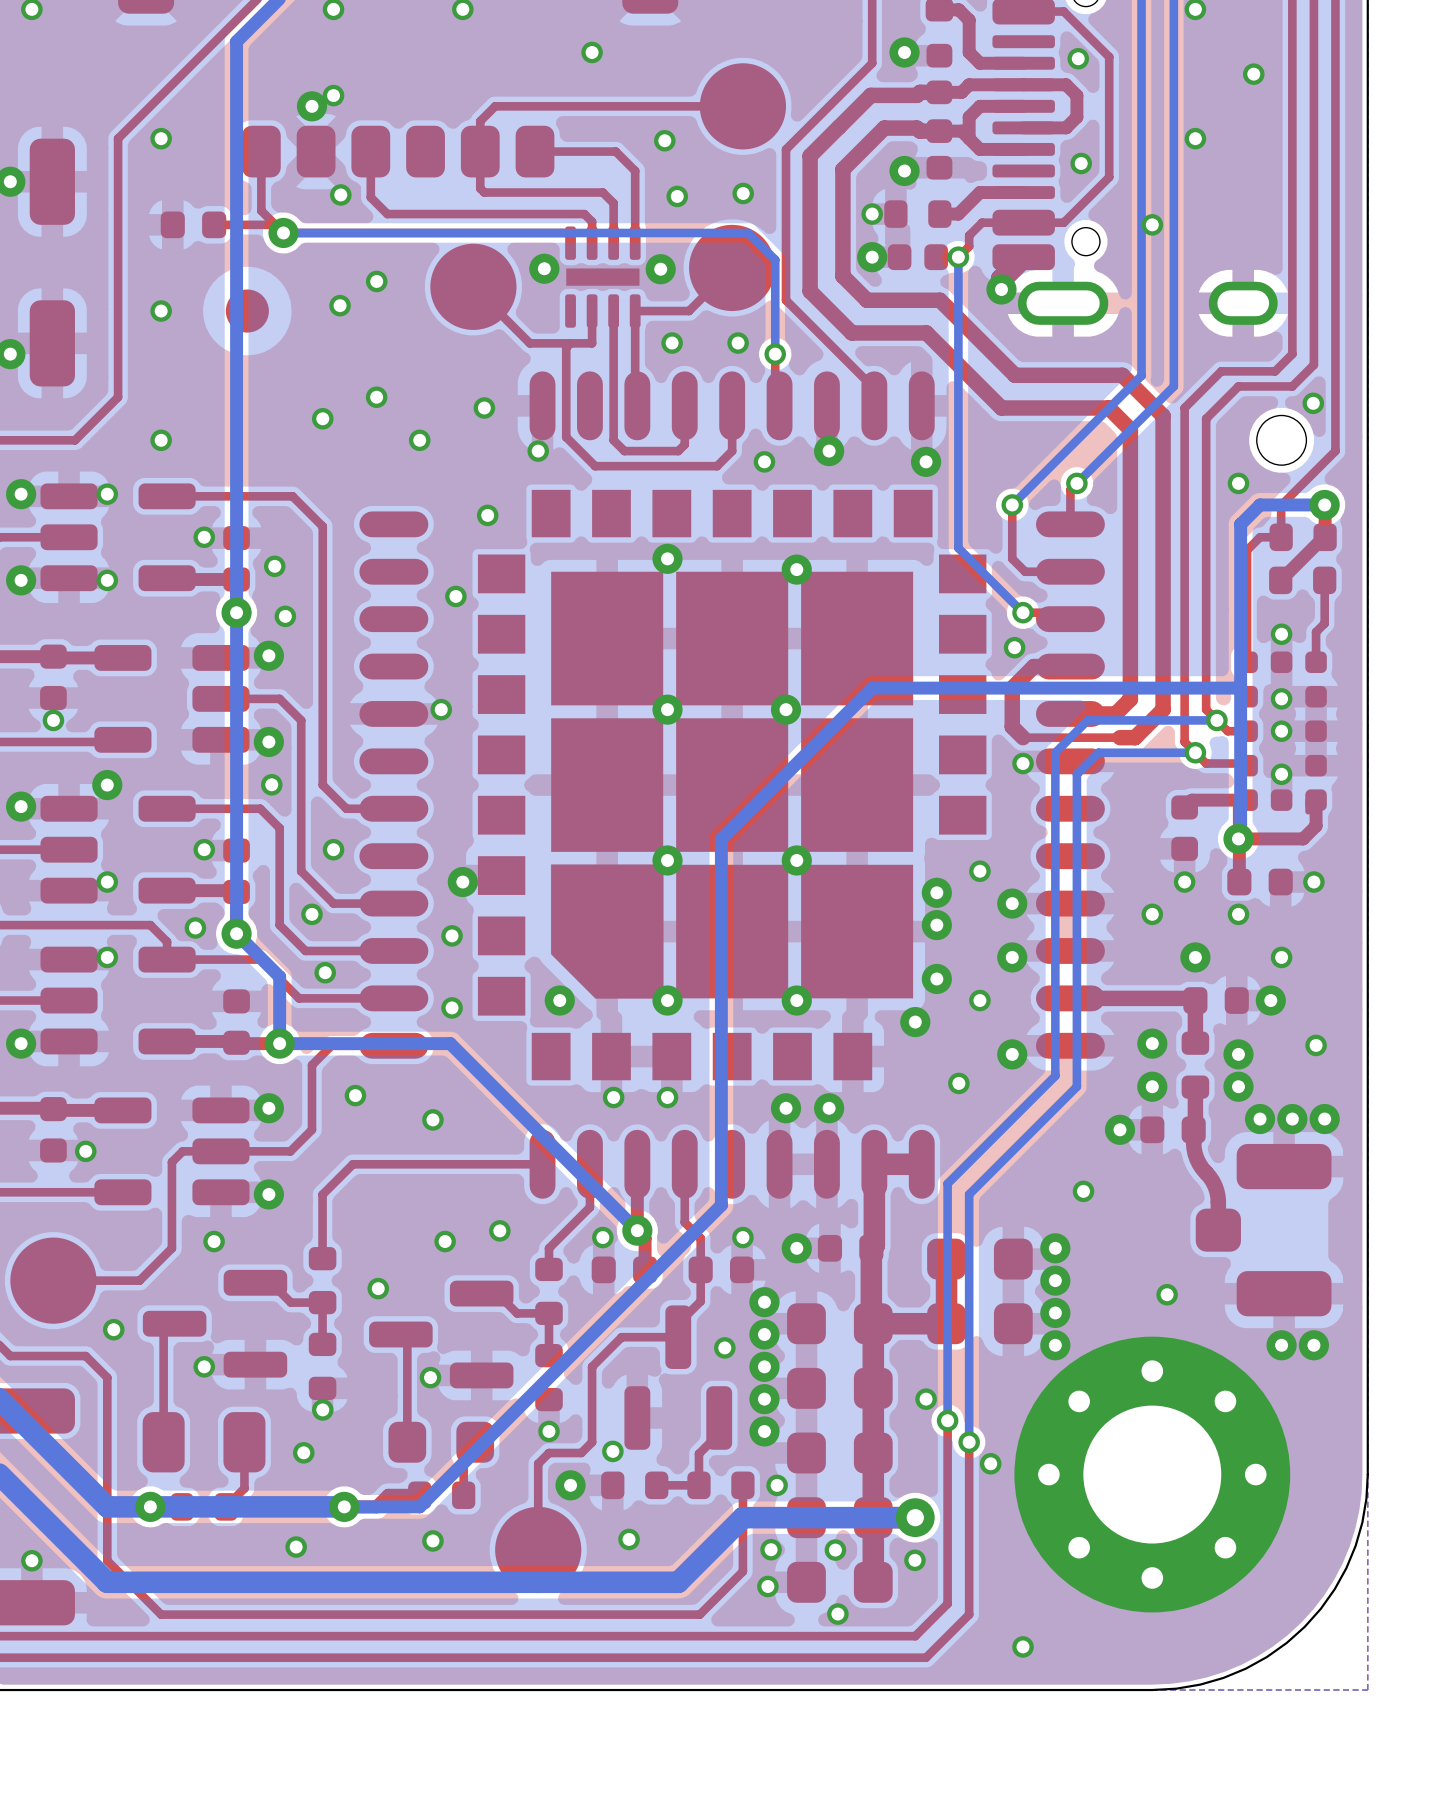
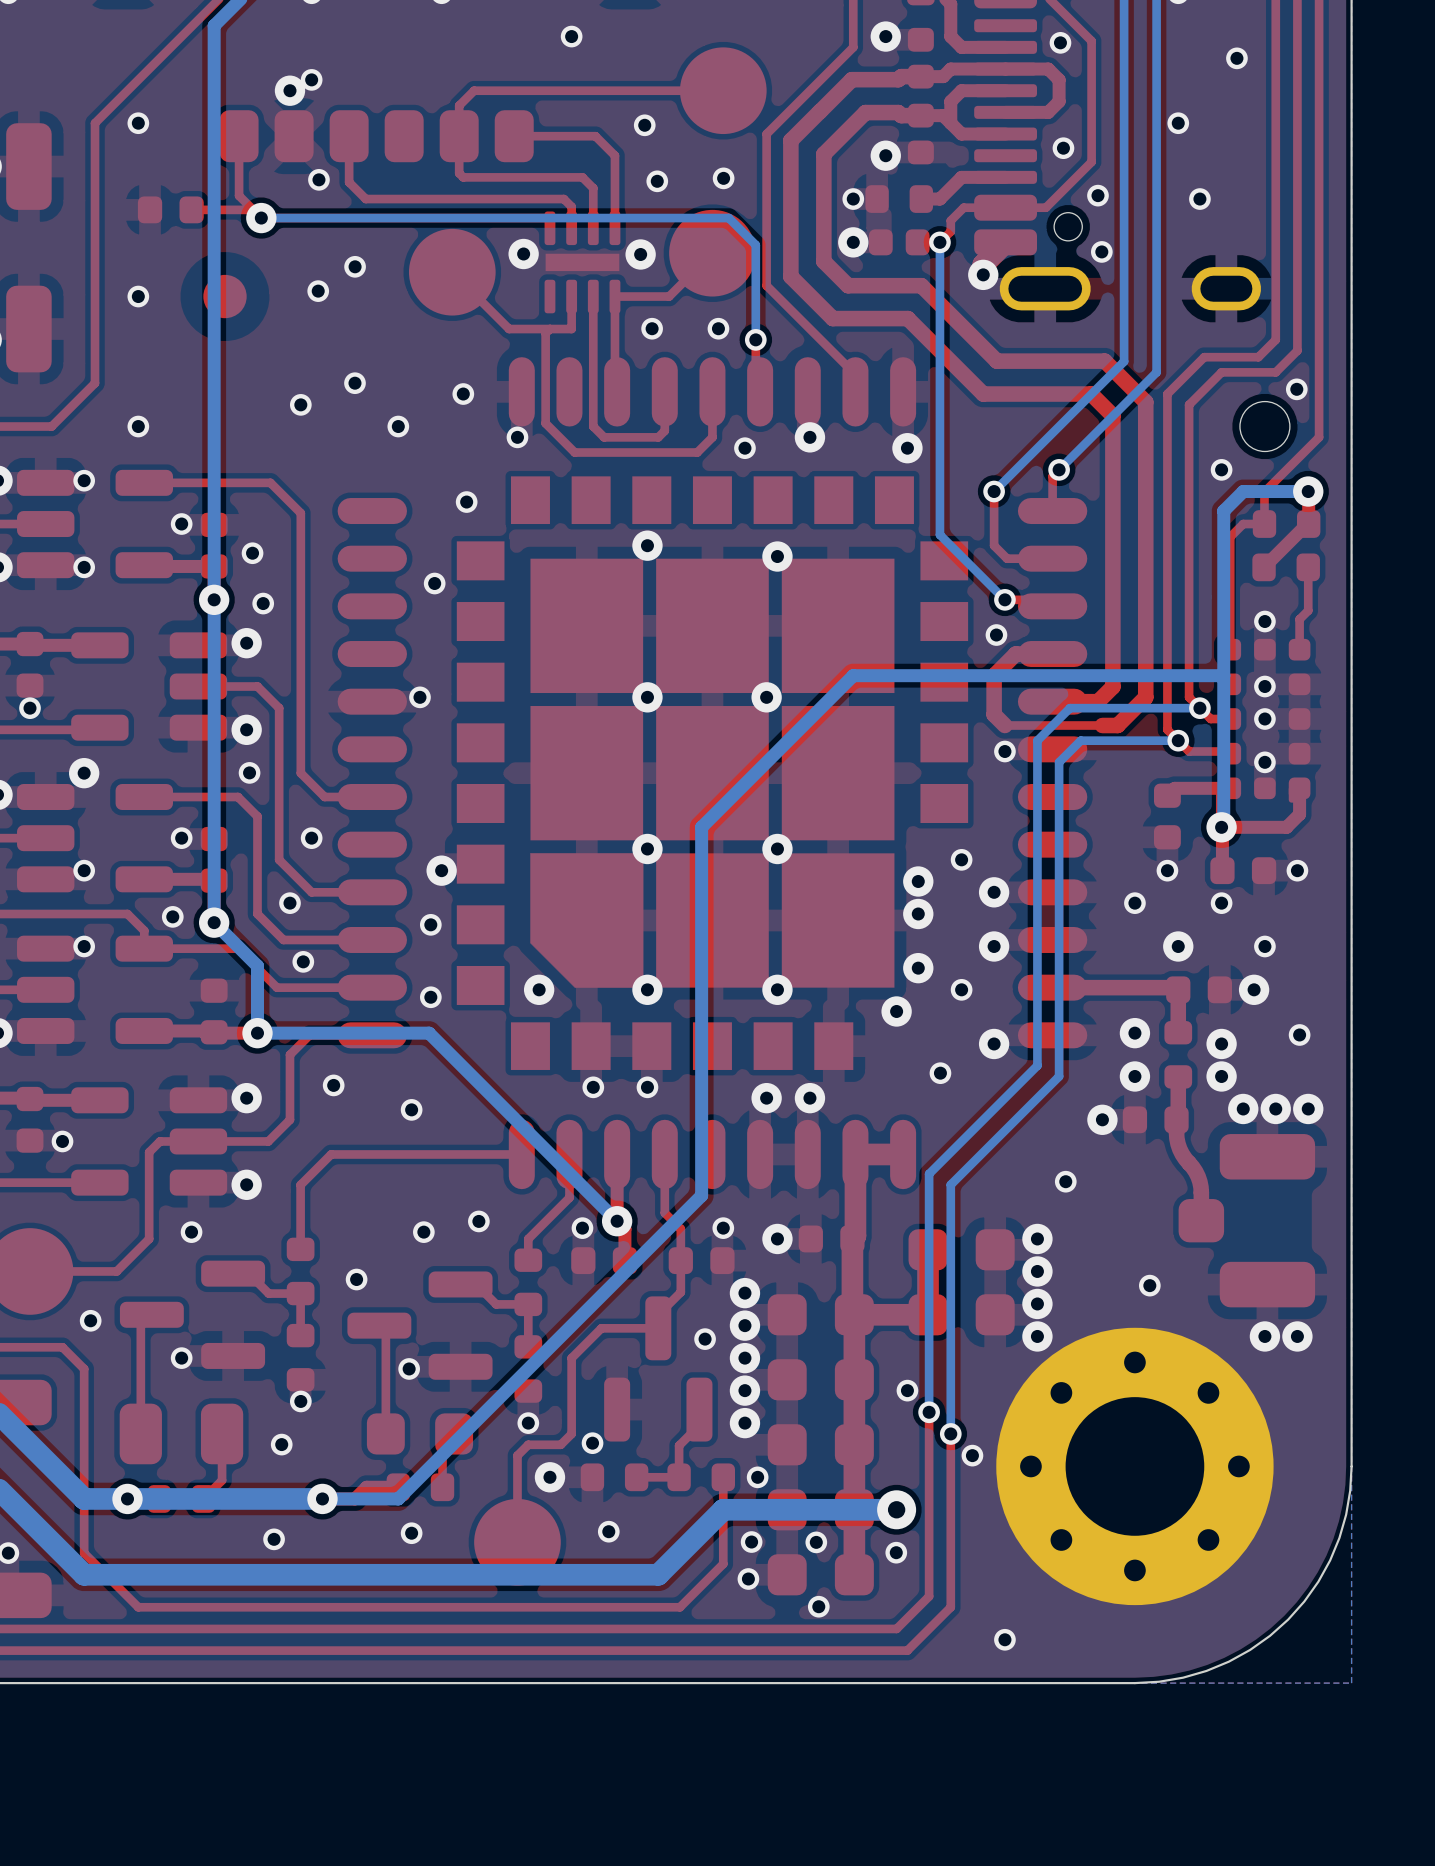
via: none -> (1097, 195)
via: none -> (1199, 199)
via: (1152, 224) -> none
via: none -> (1101, 251)

